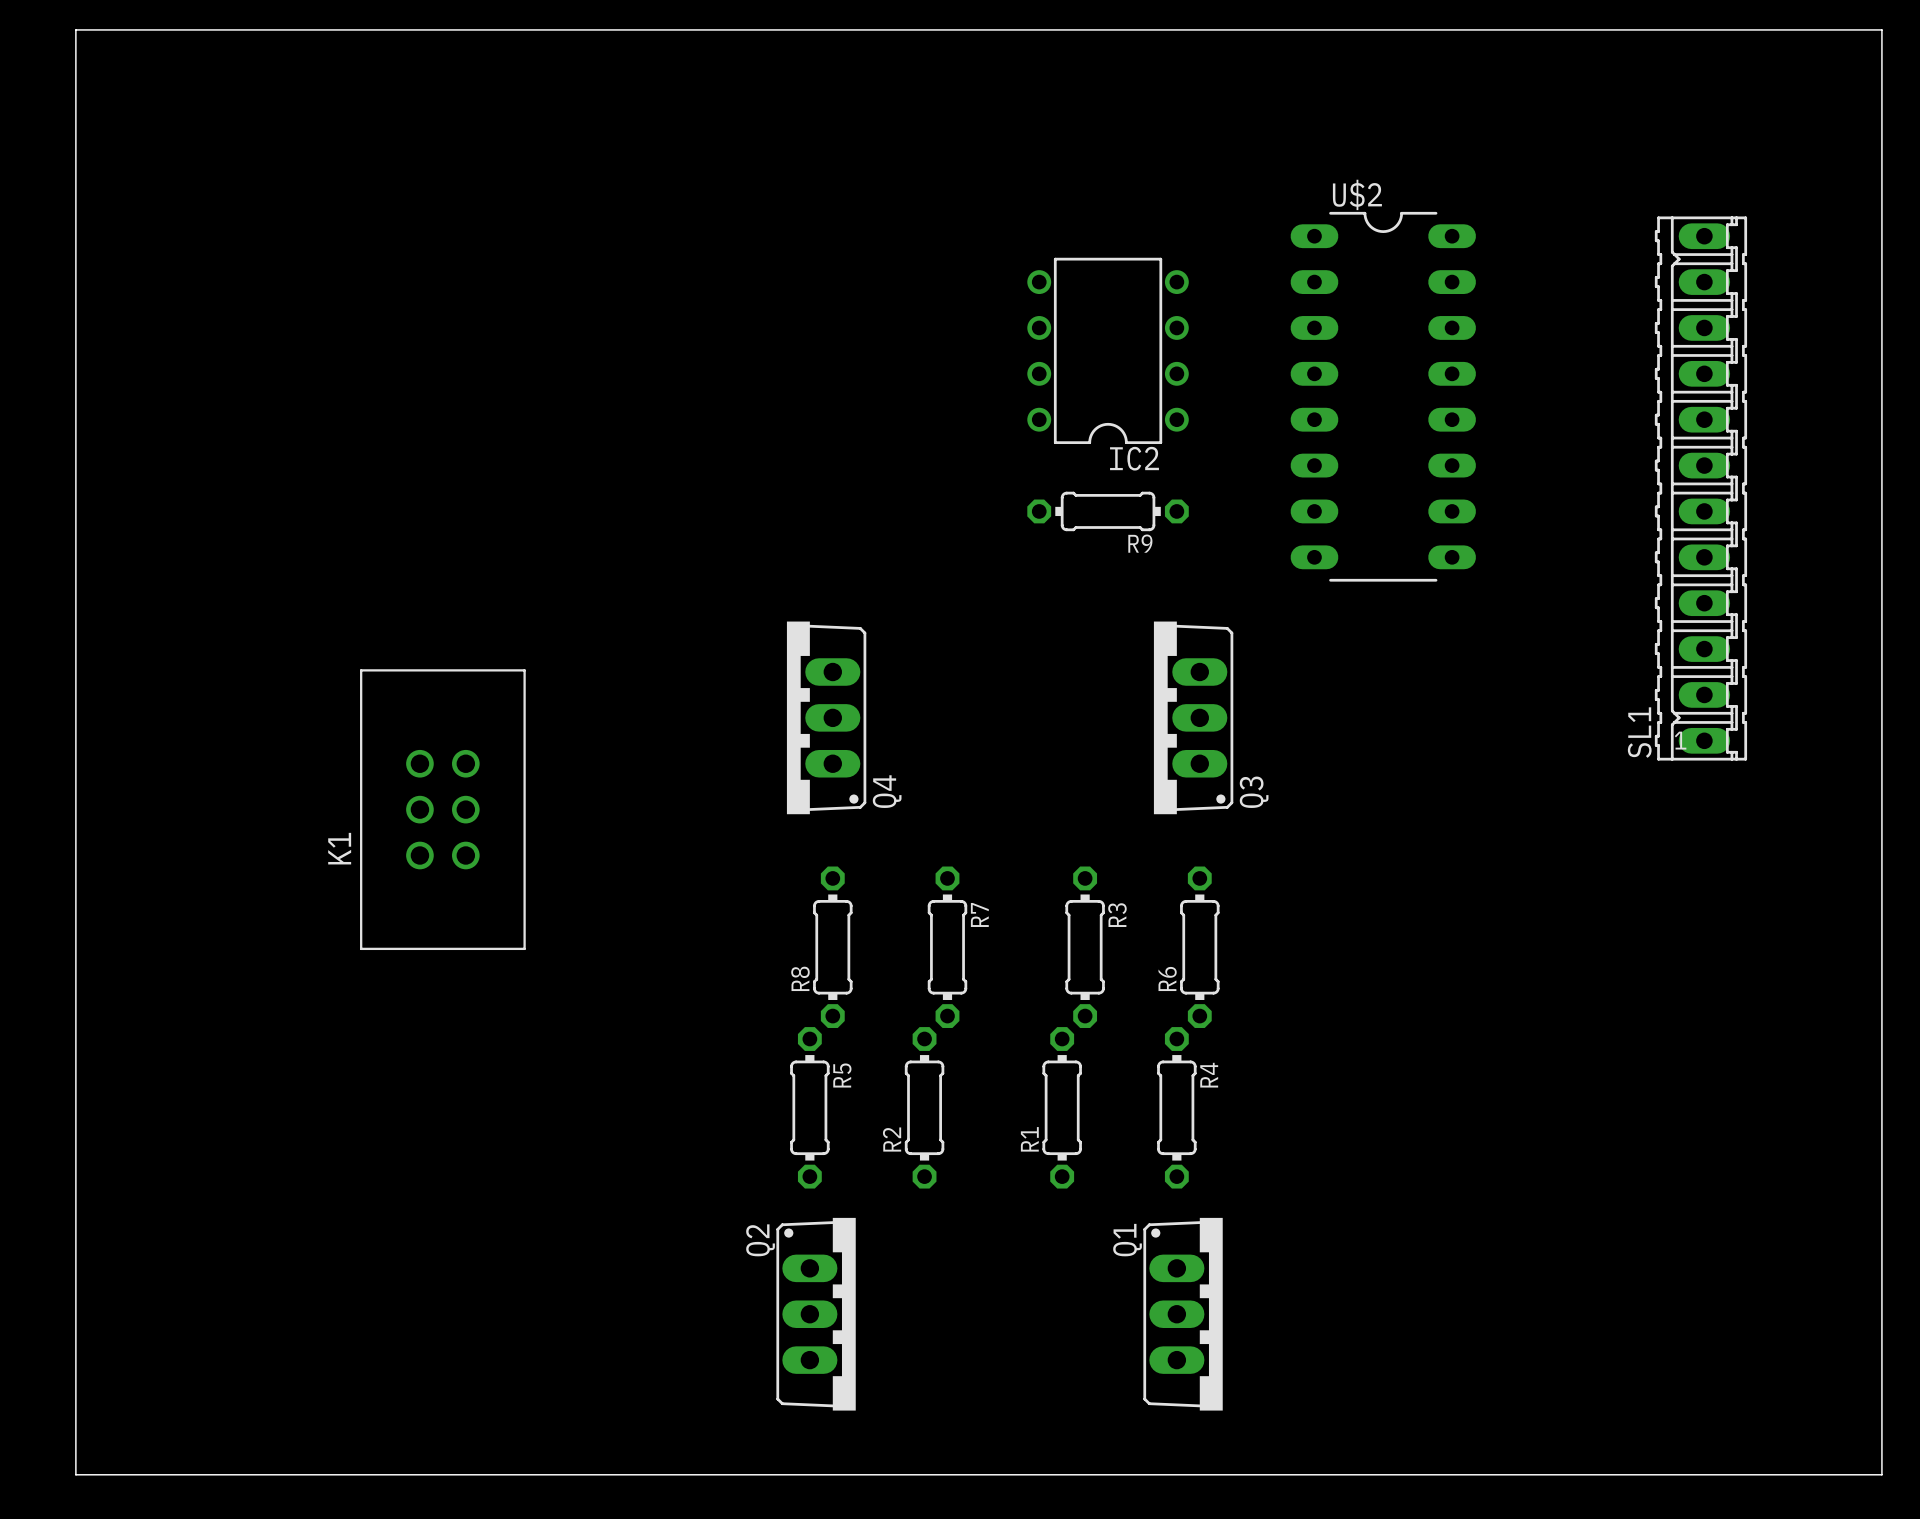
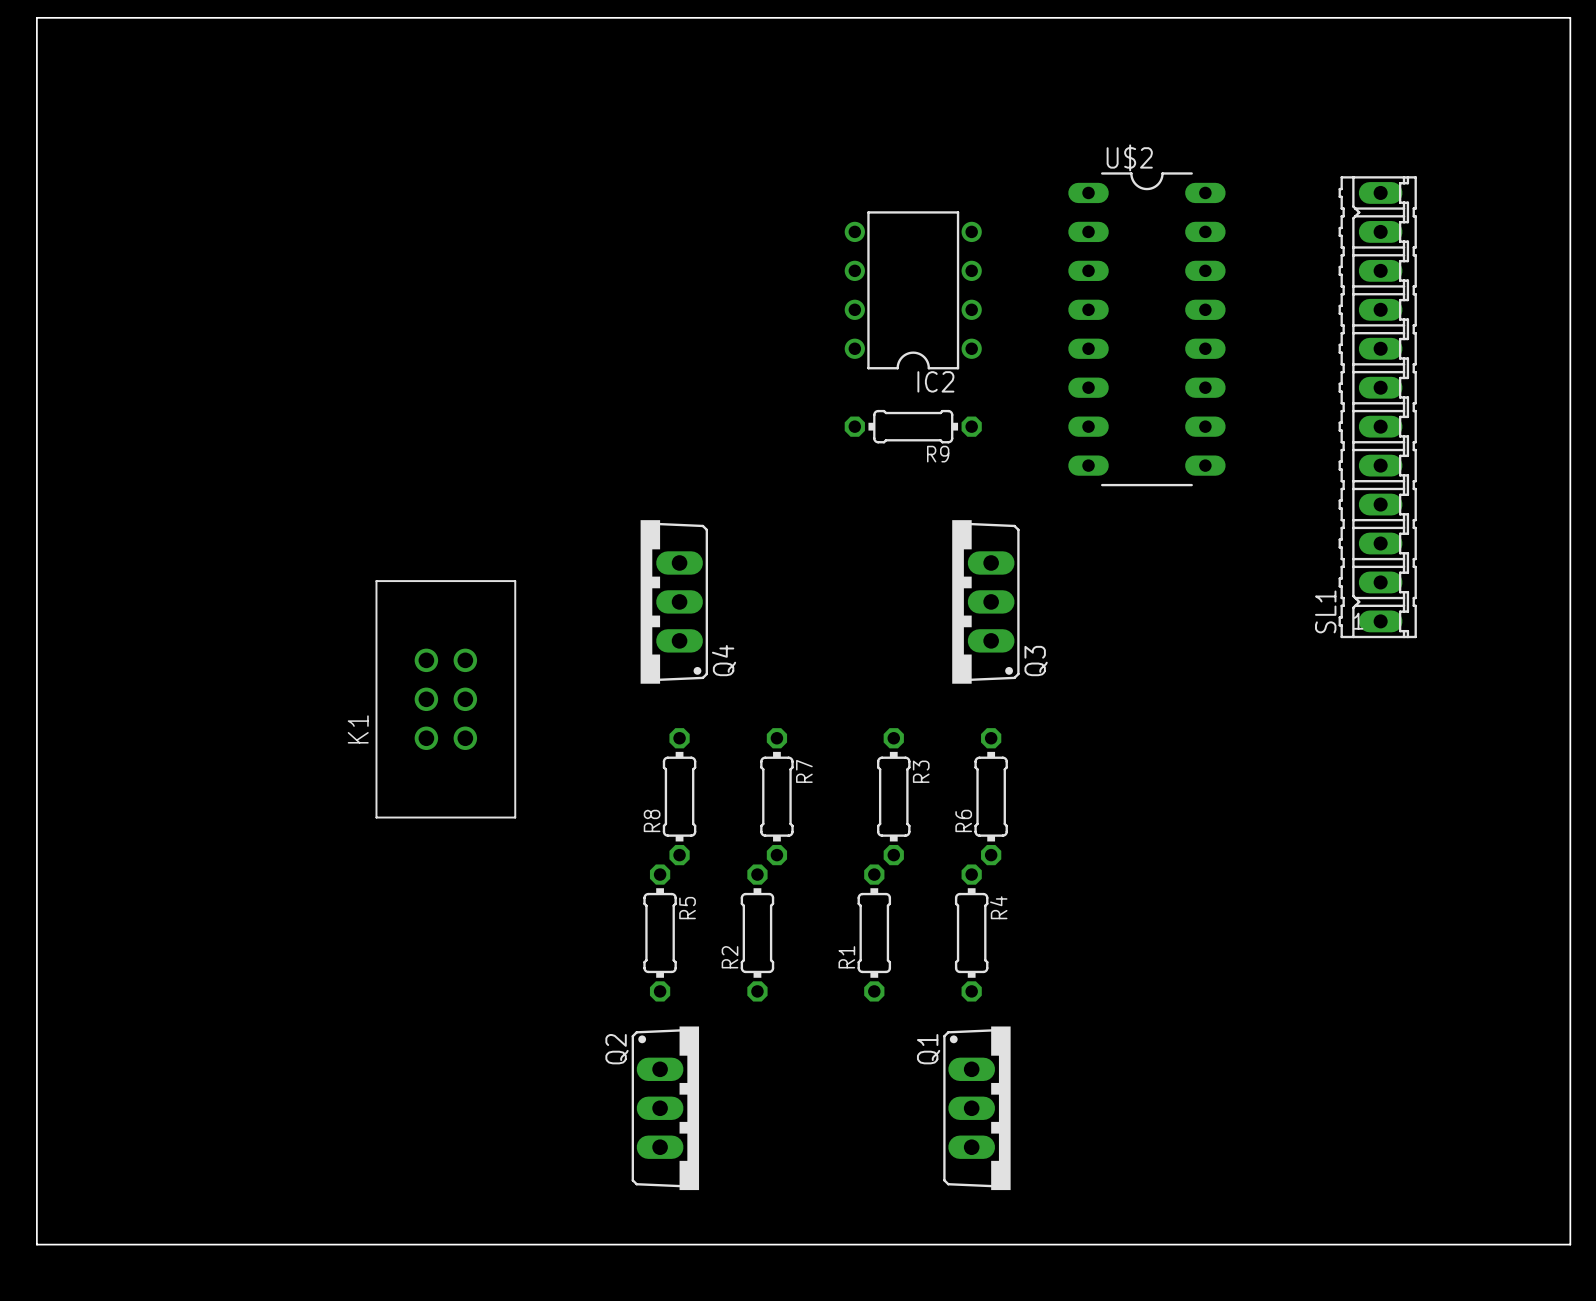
SL1 position: (1700, 488) -> (1377, 407)
K1 position: (442, 809) -> (445, 699)

